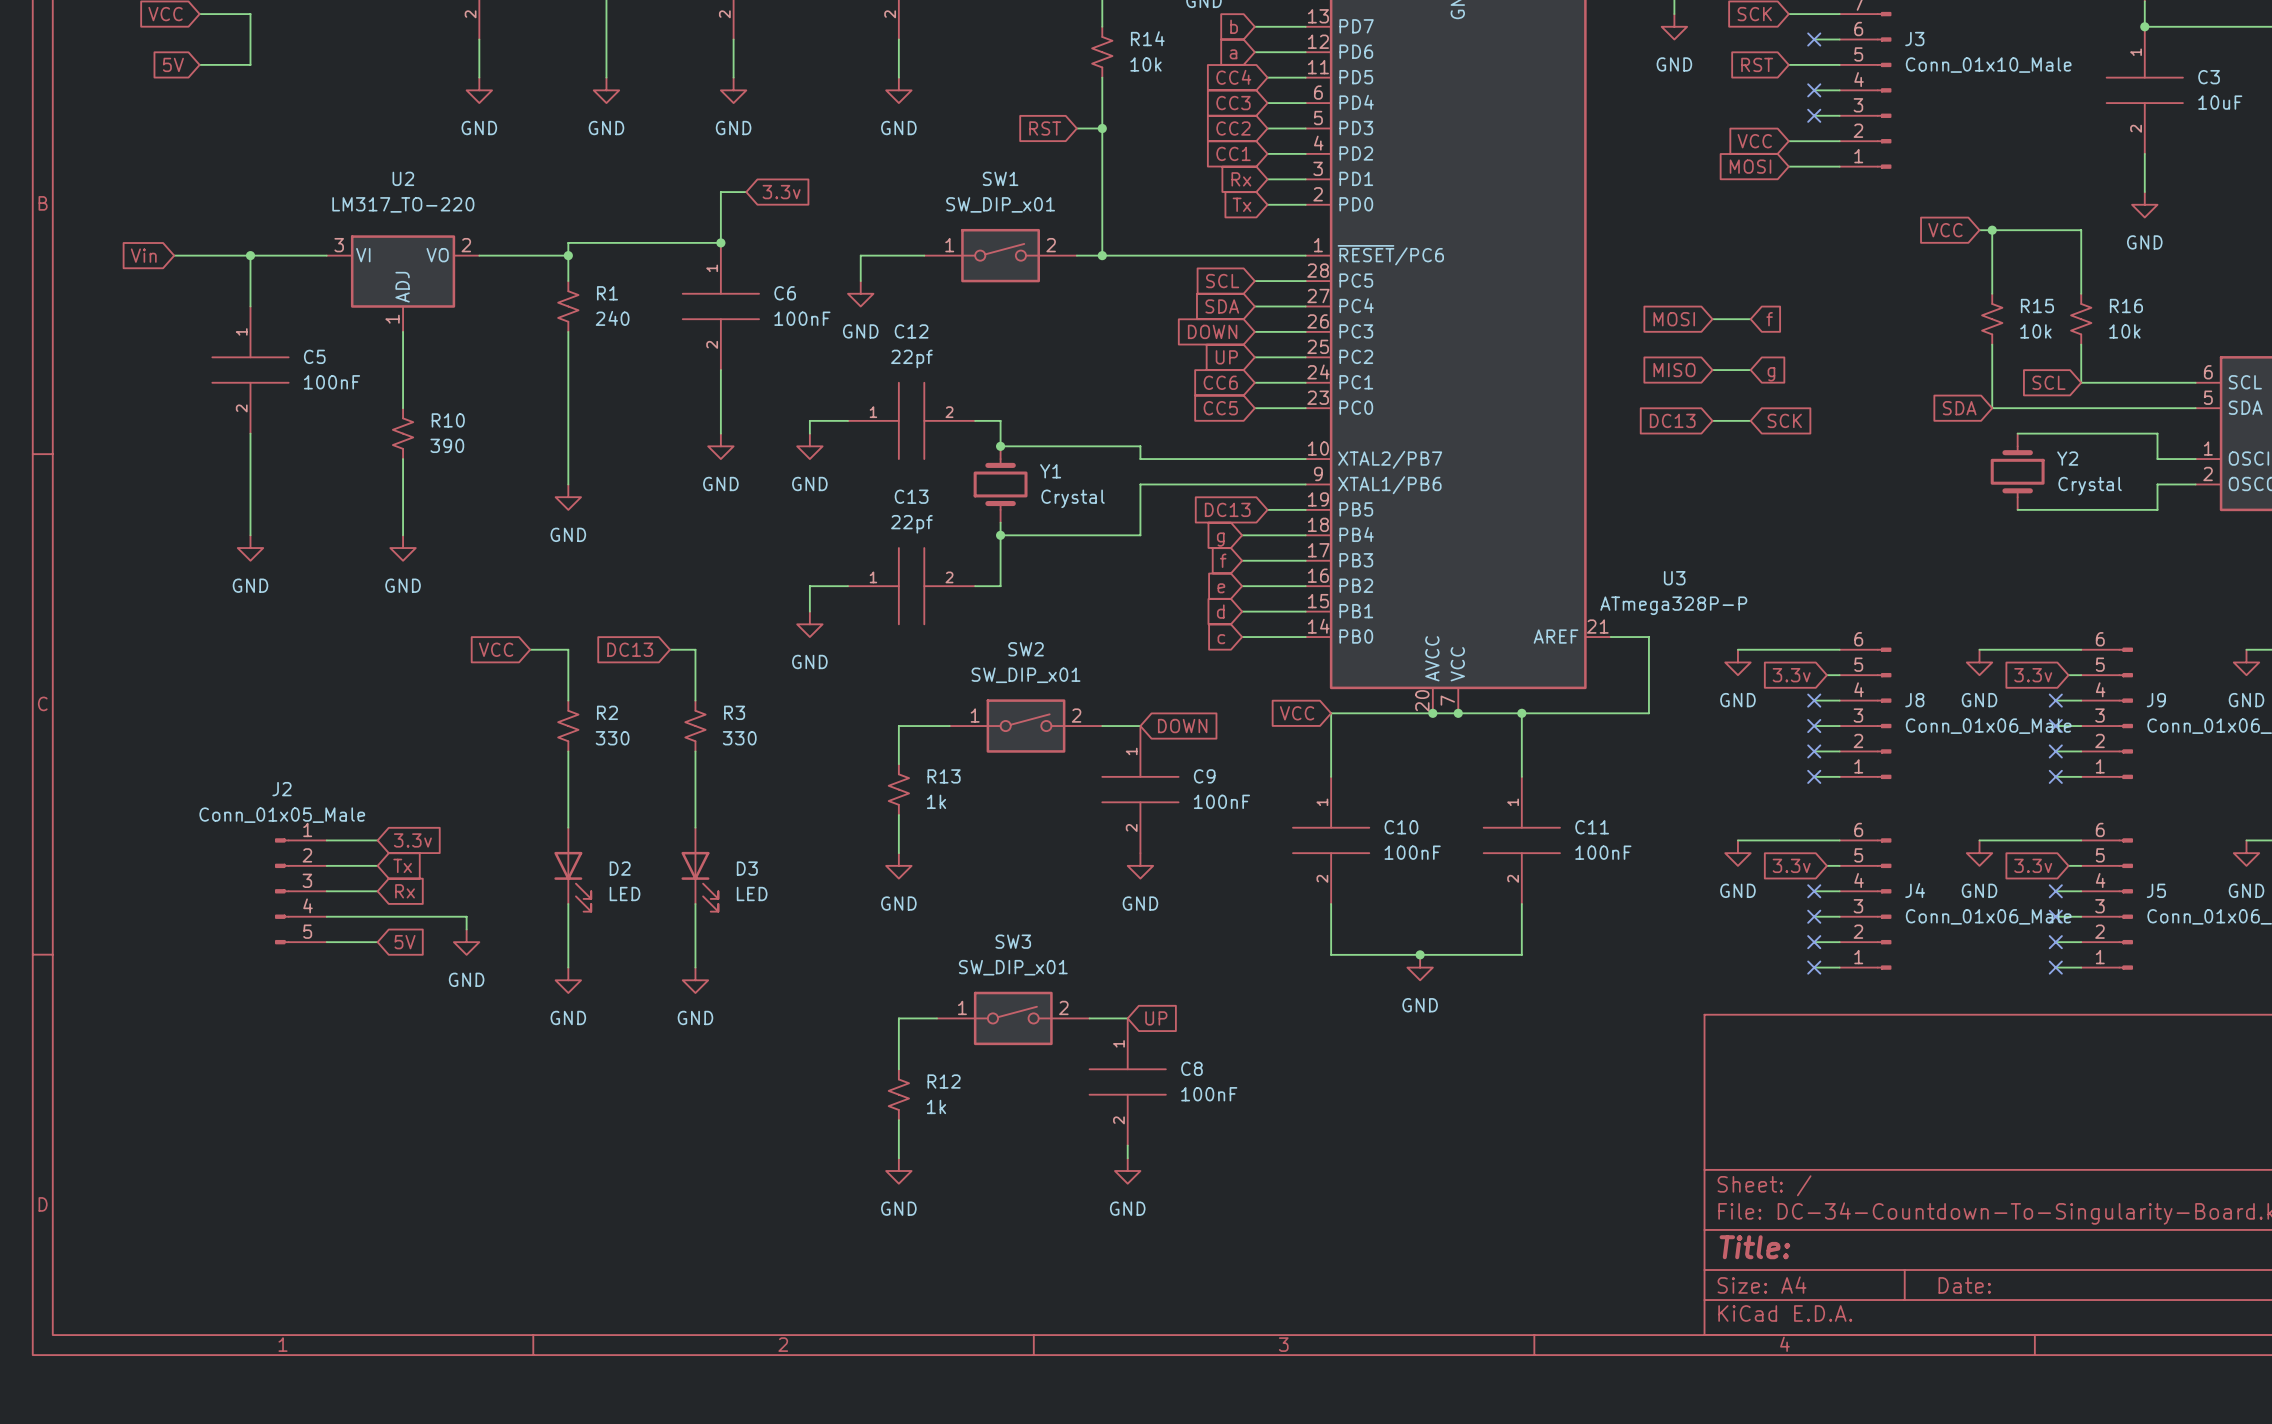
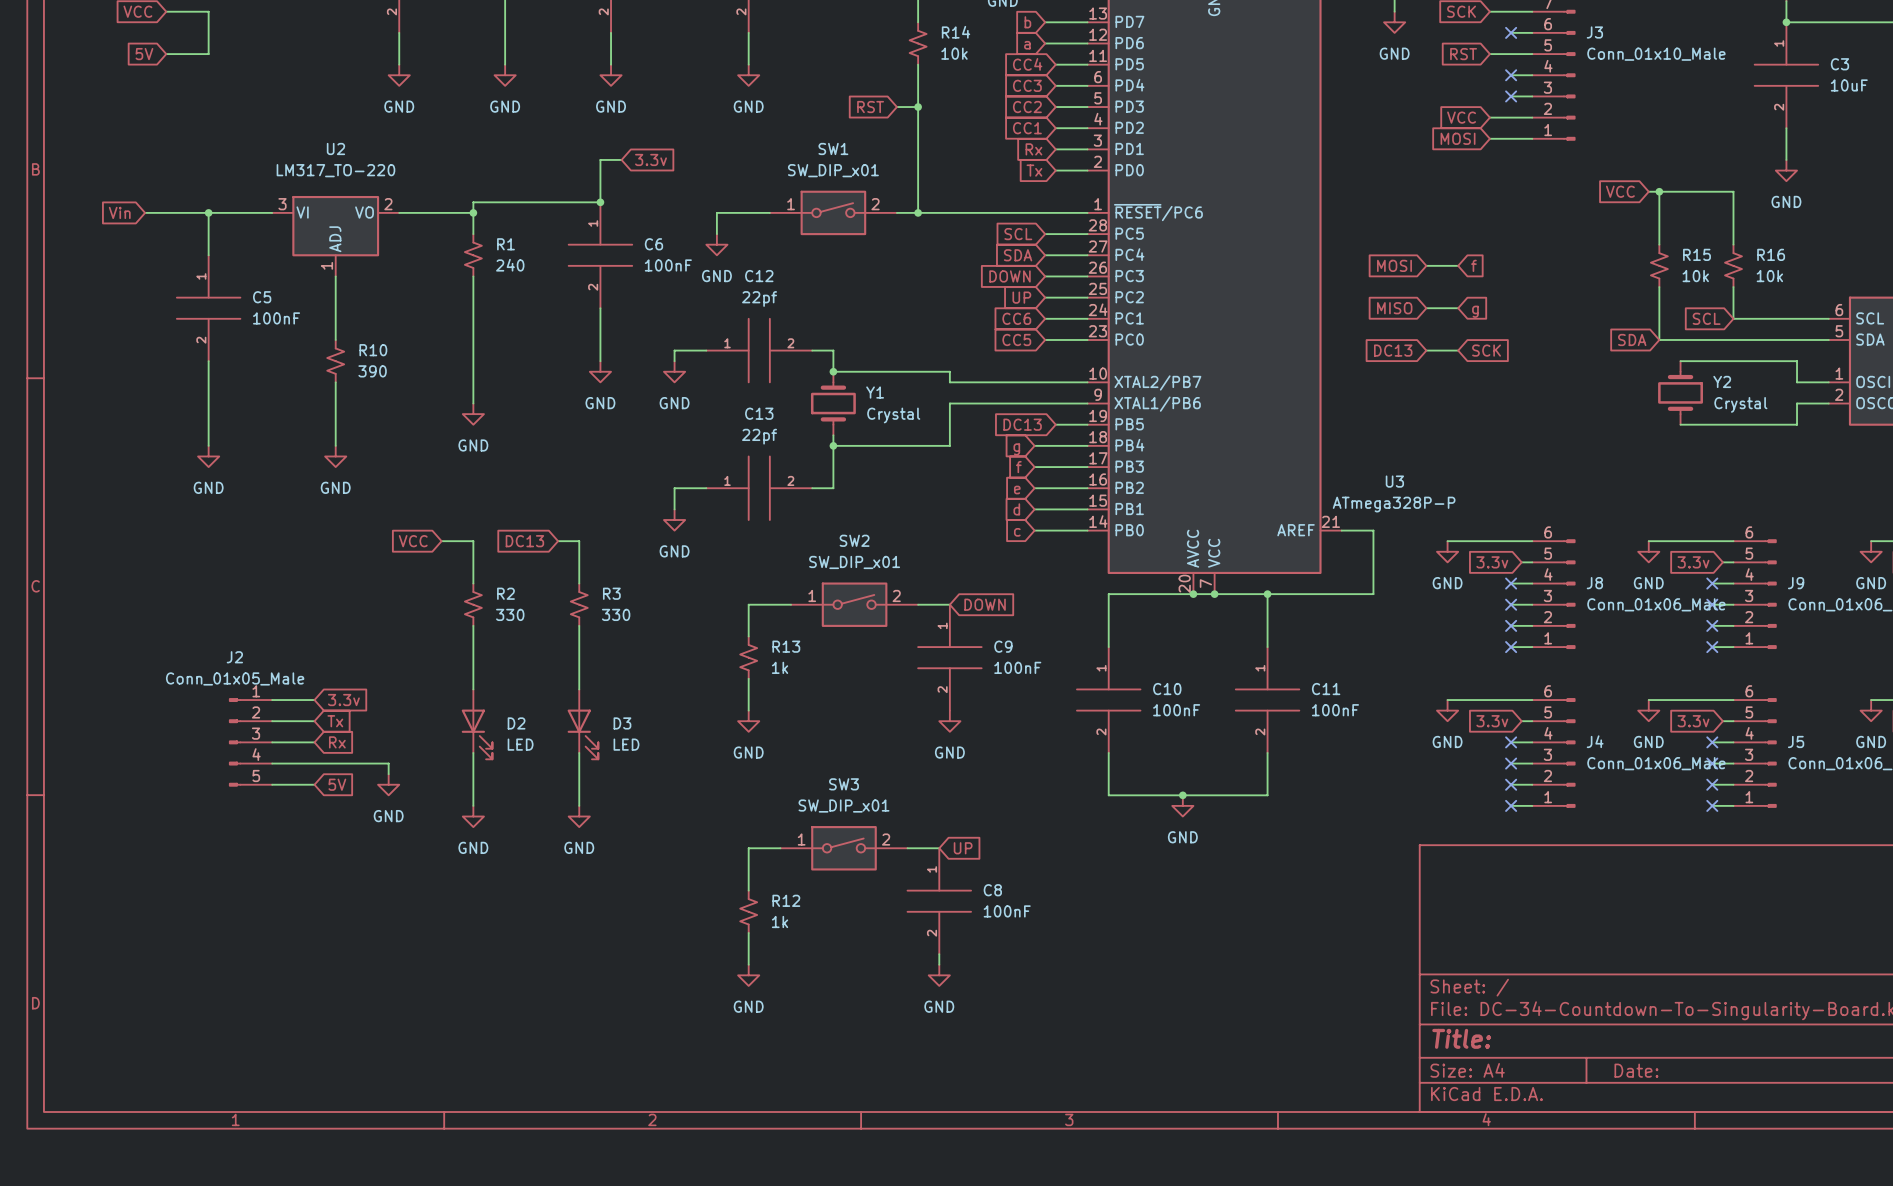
global label: VCC (1297, 713) -> none

